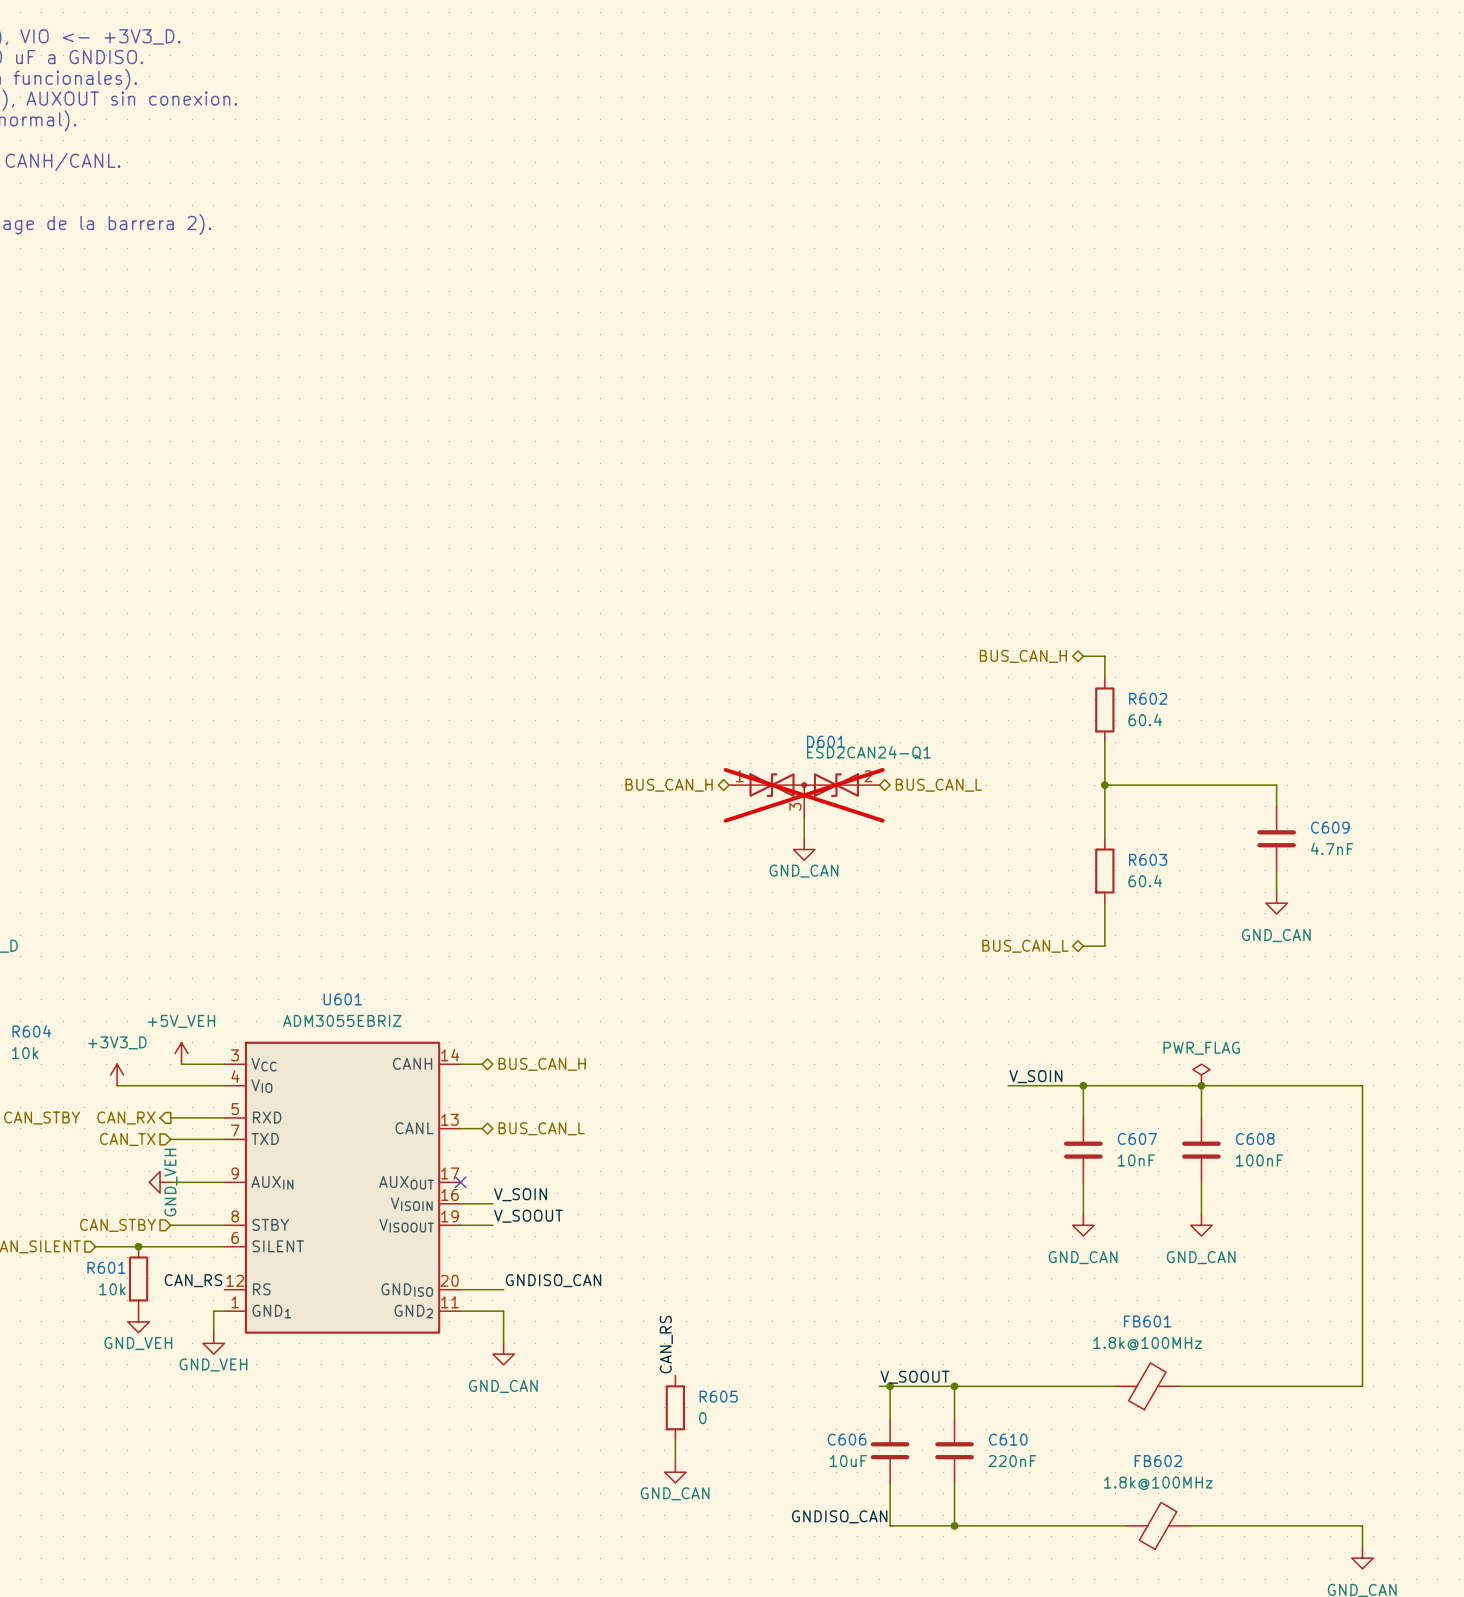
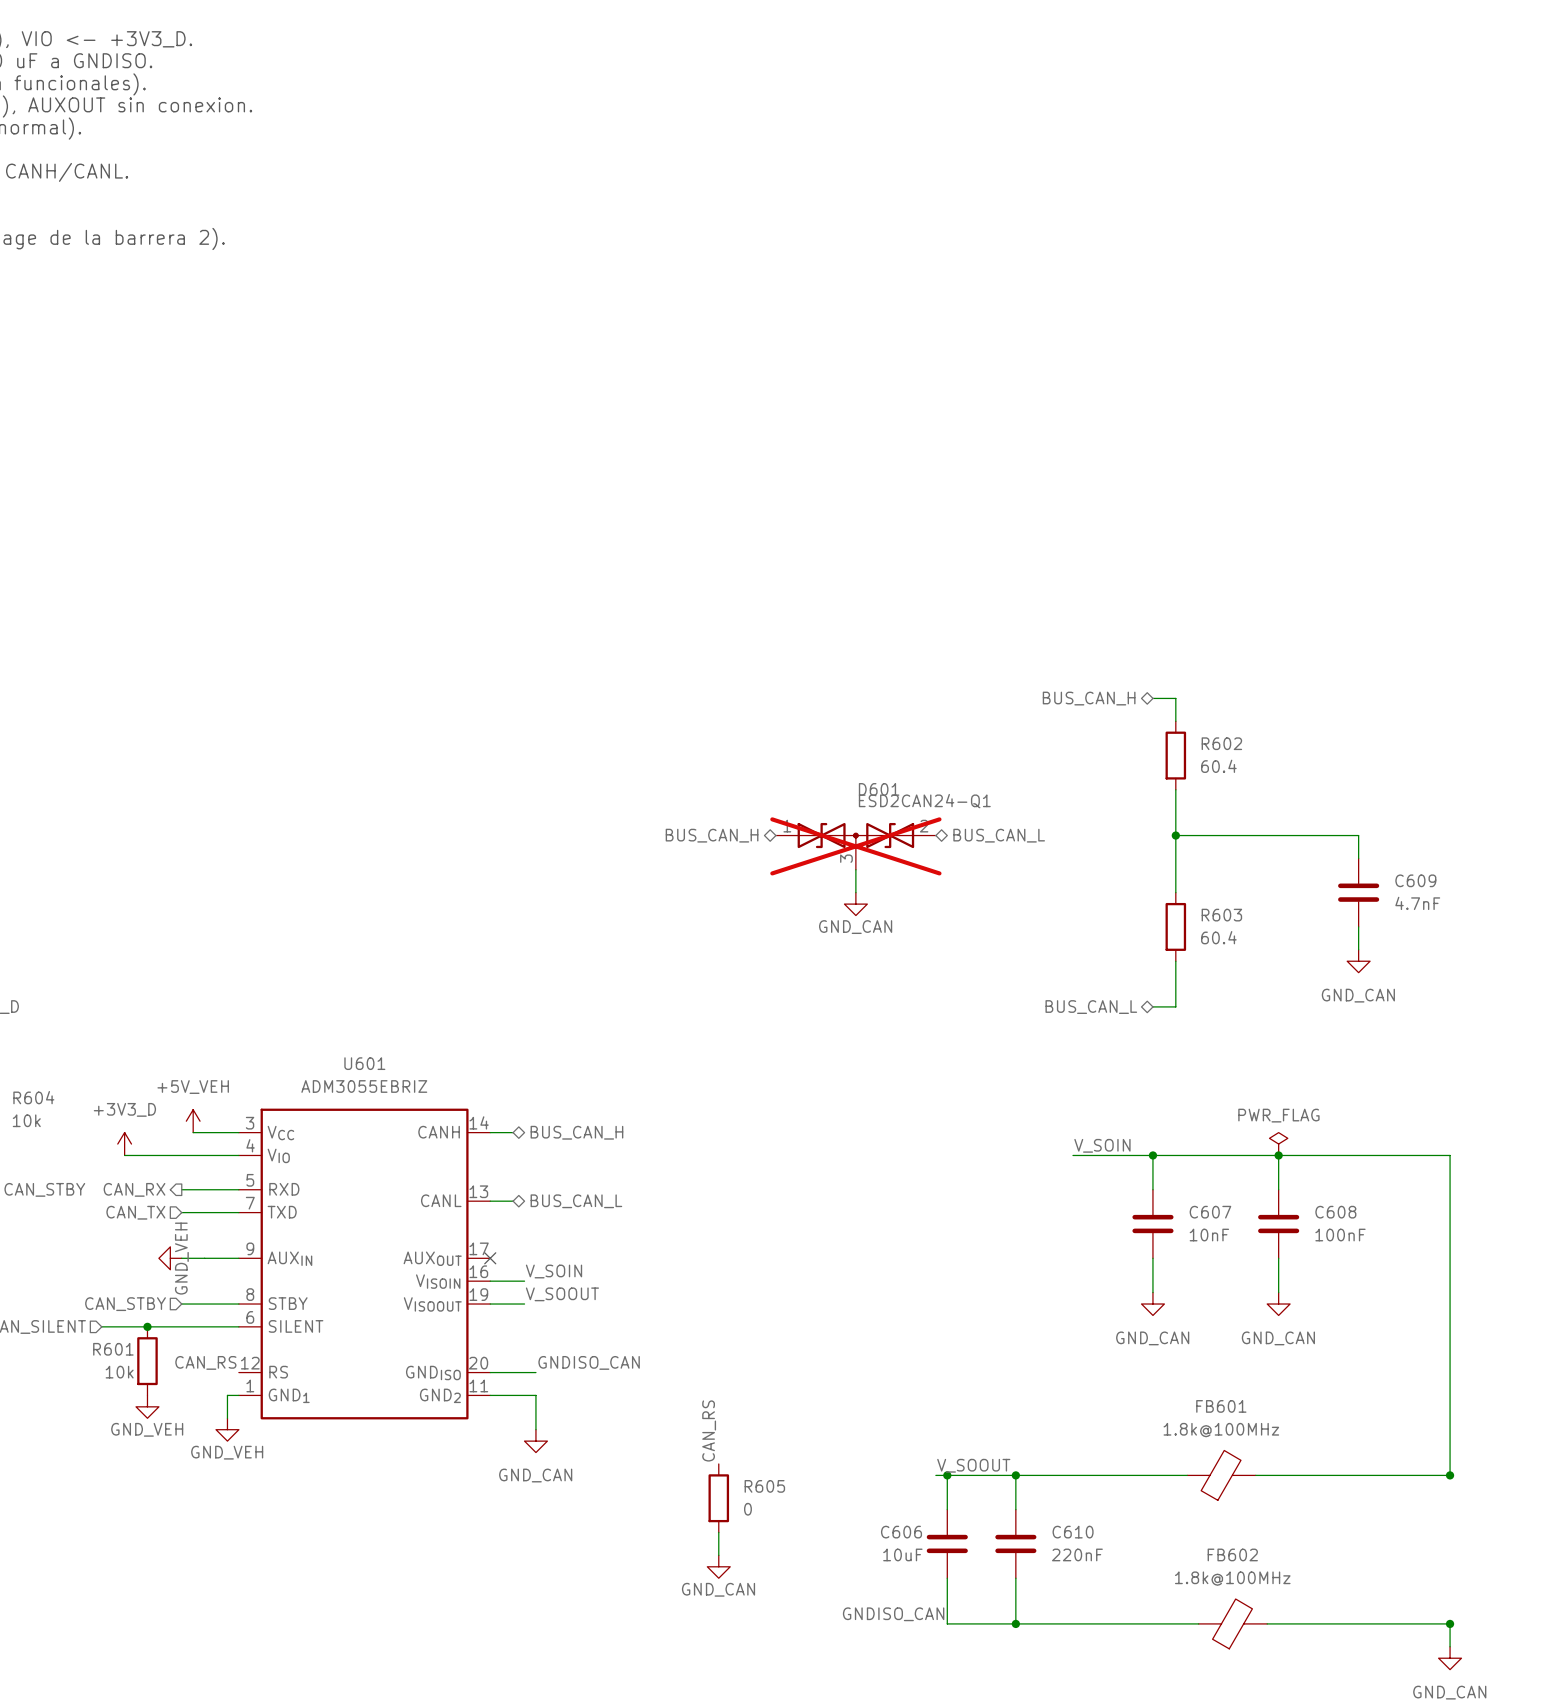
junction: none -> (1450, 1475)
junction: none -> (1450, 1623)

